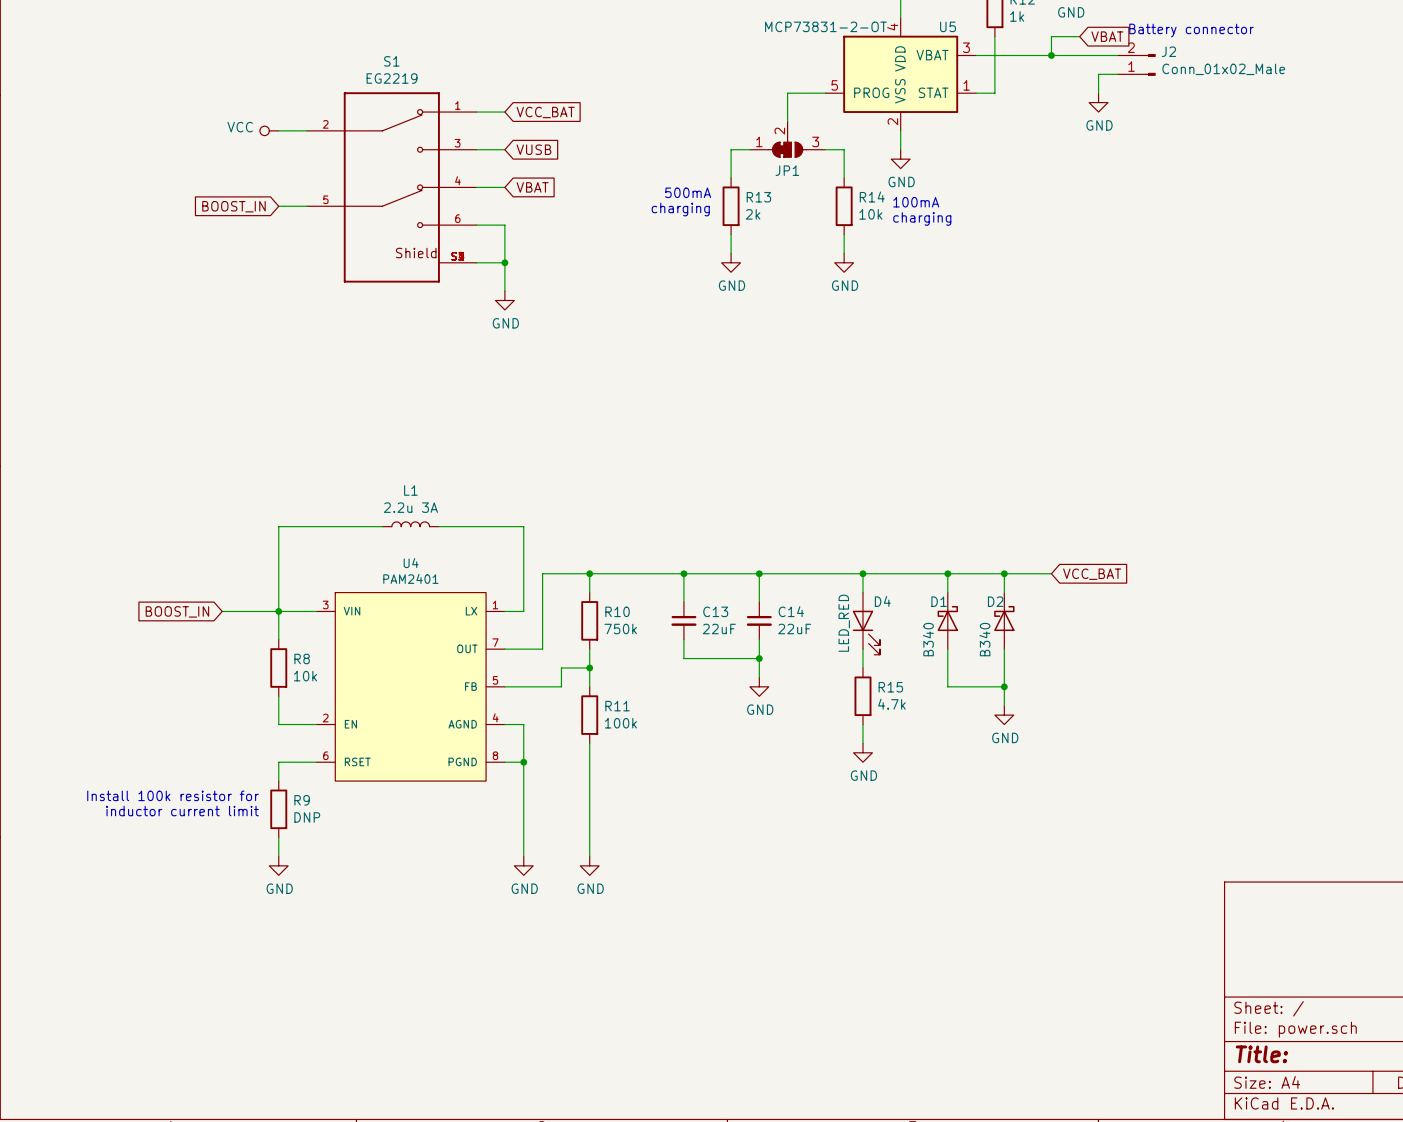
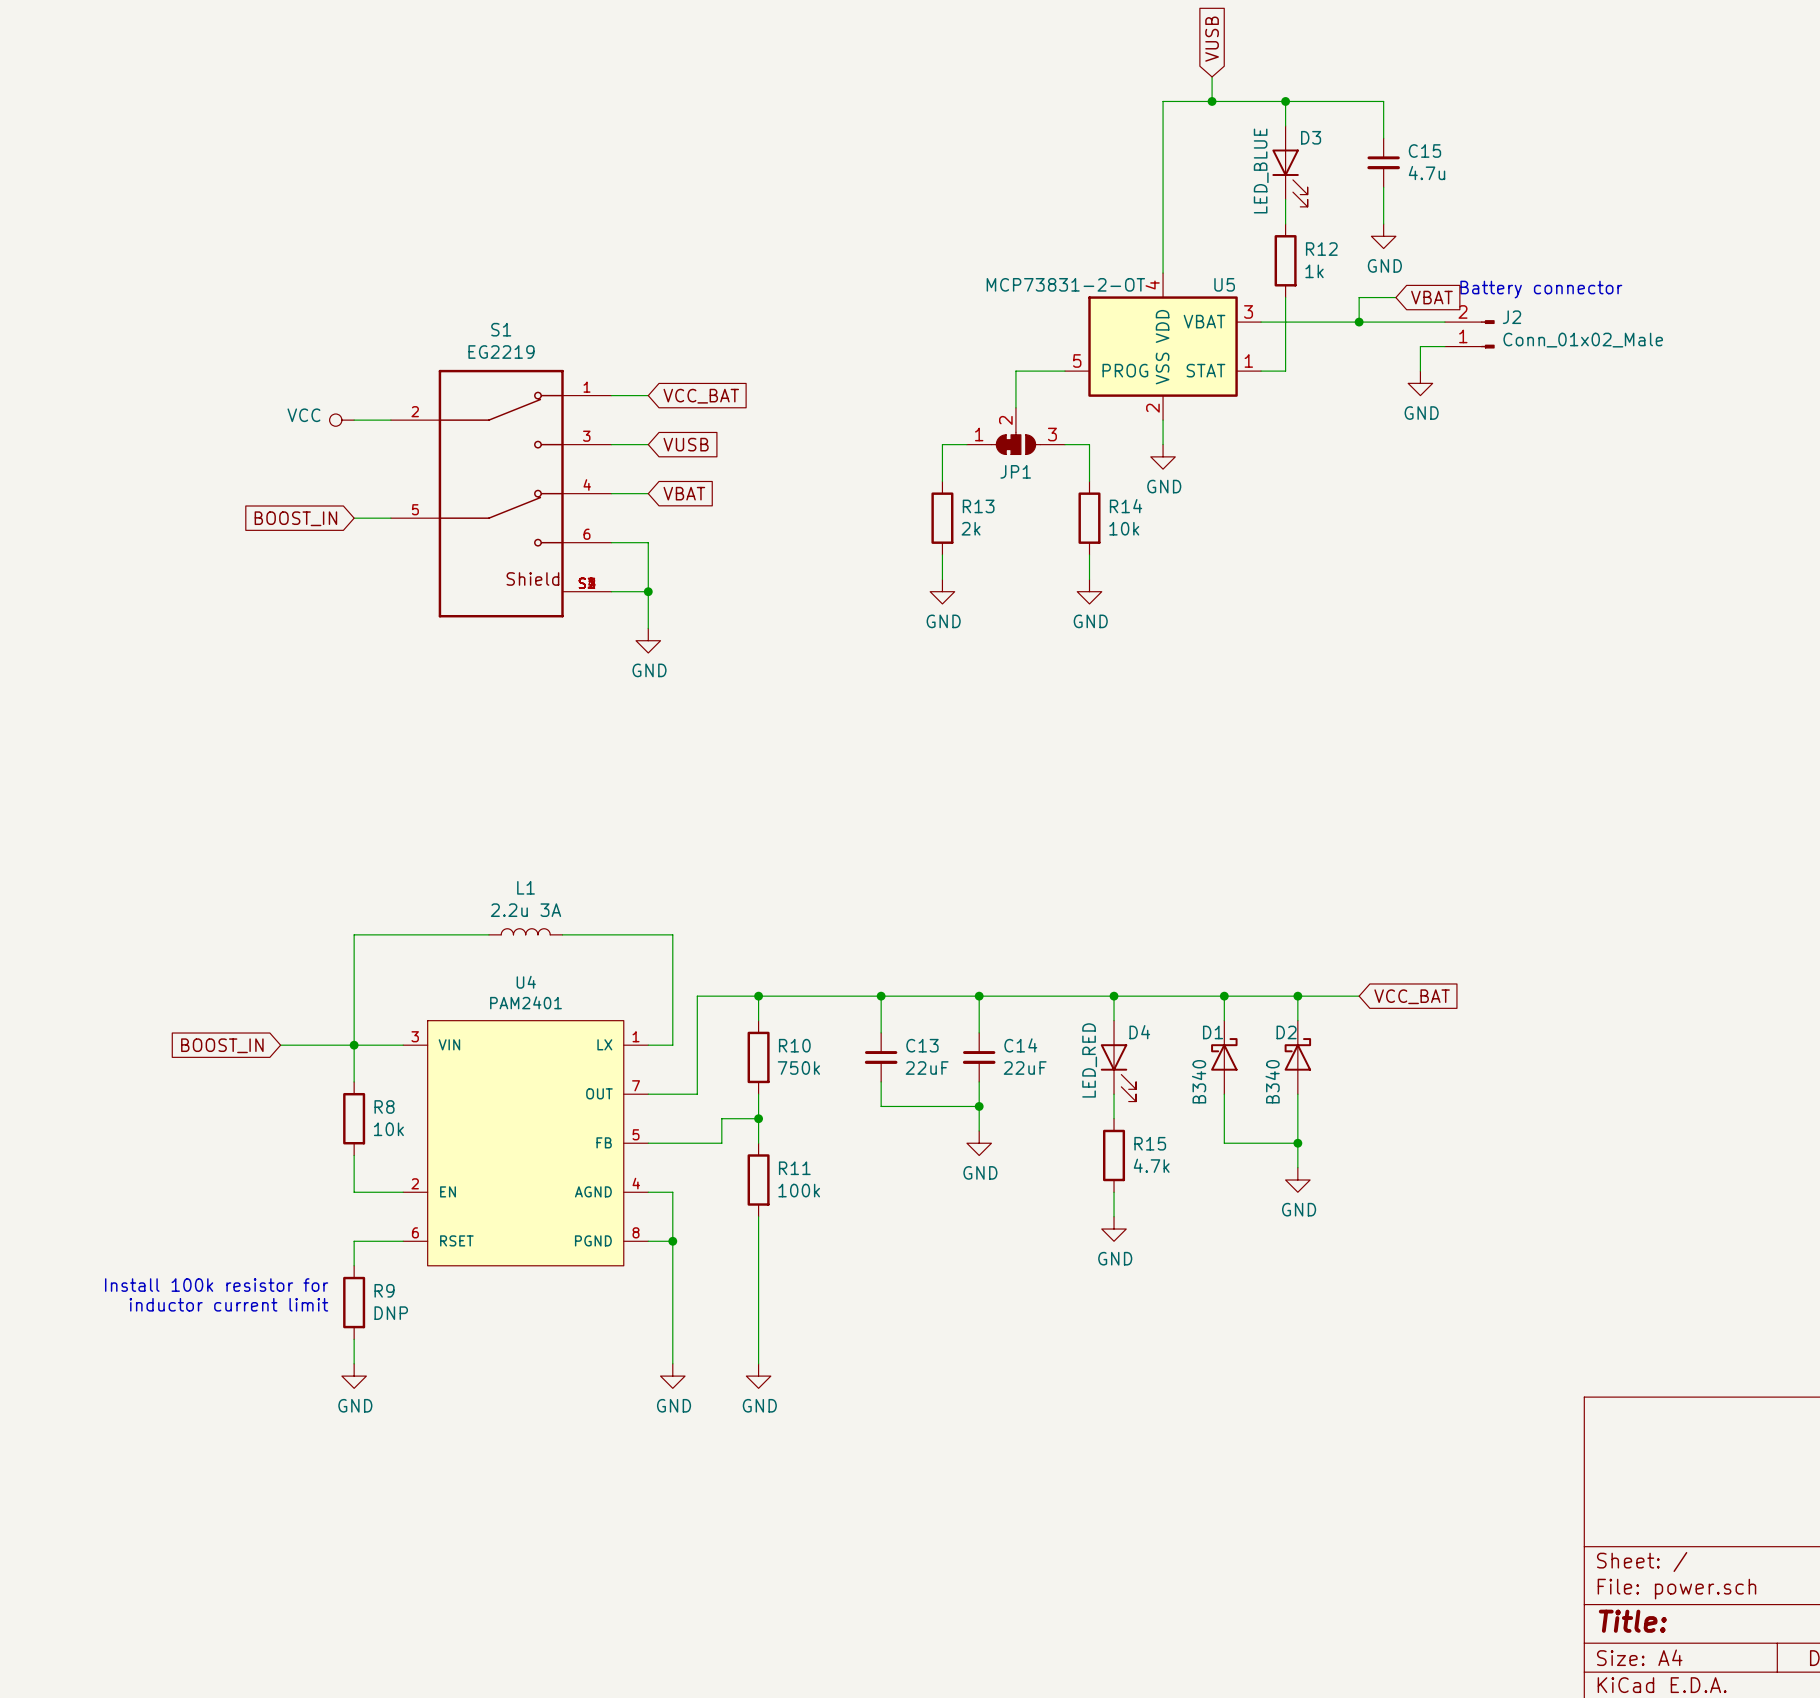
text: 500mA (688, 192) -> none
text: 100mA (916, 202) -> none
text: charging (680, 209) -> none
text: charging (922, 218) -> none

